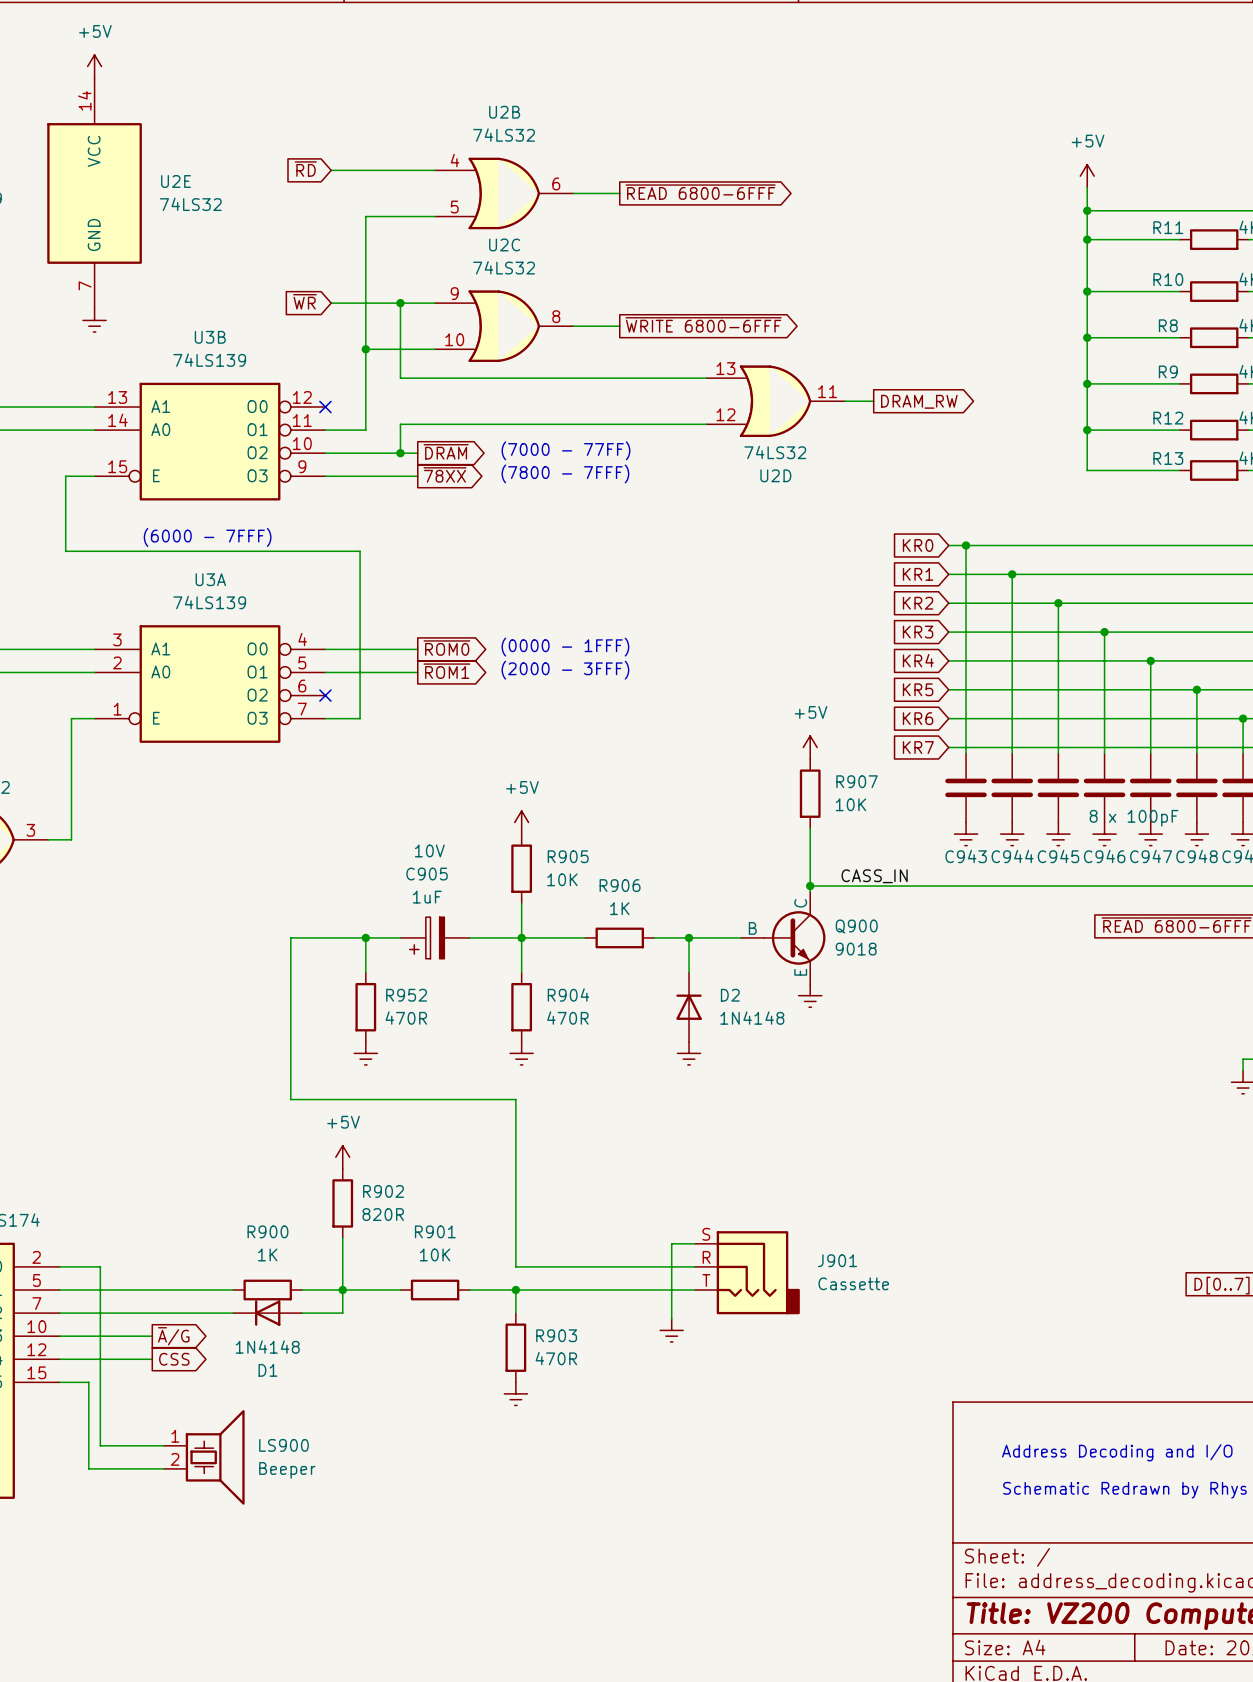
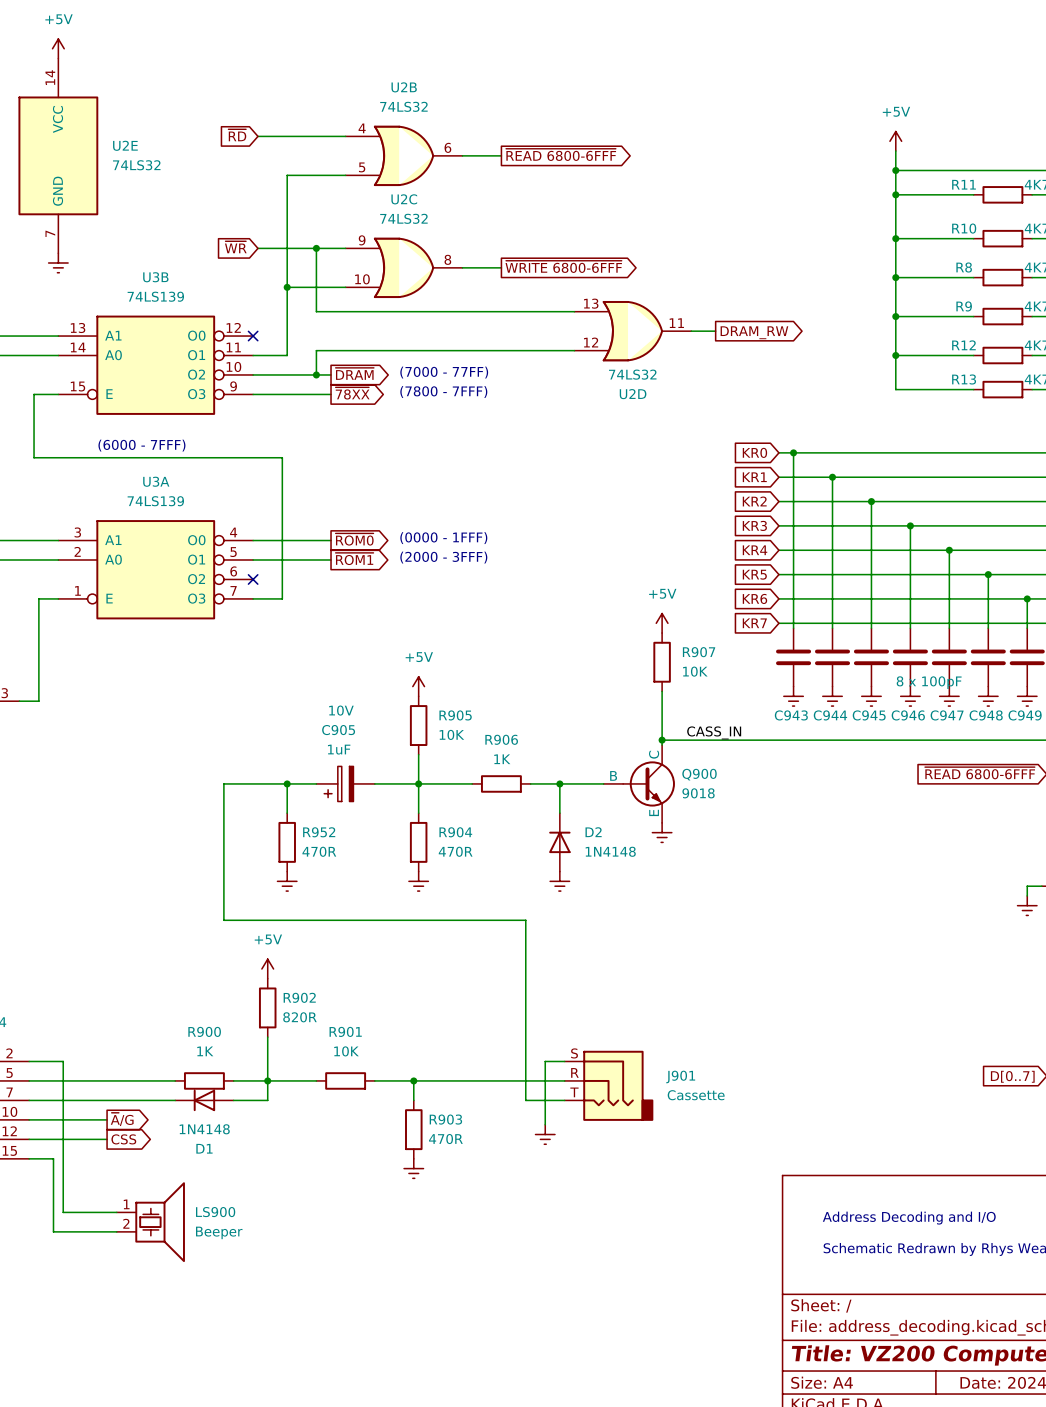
wire: (515, 1099) (515, 1266) (671, 1266) (671, 1243) (694, 1243) -> (413, 920) (525, 920) (525, 1100) (564, 1100)
J901 position: (747, 1272) -> (609, 1085)
power symbol position: (671, 1330) -> (545, 1134)

